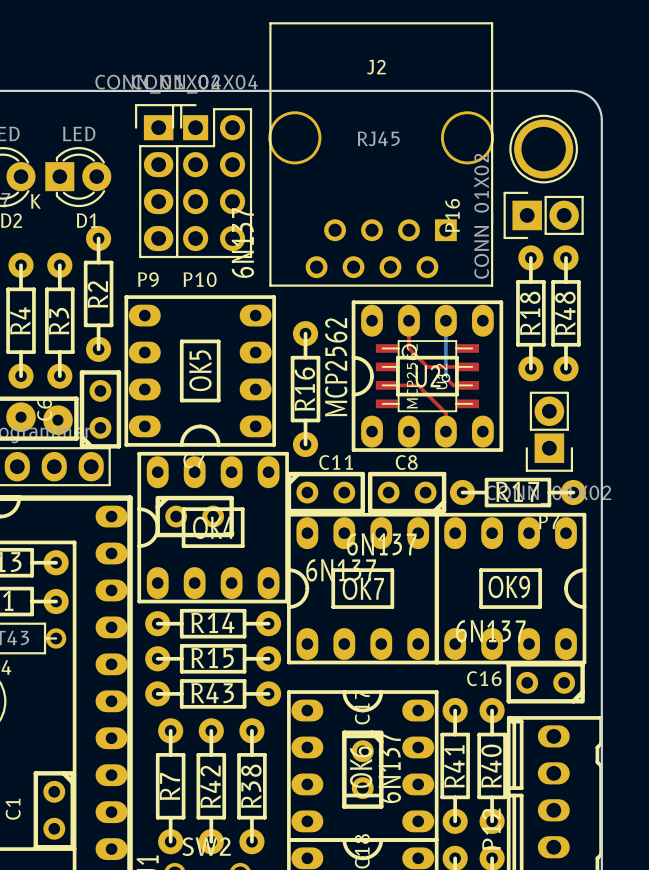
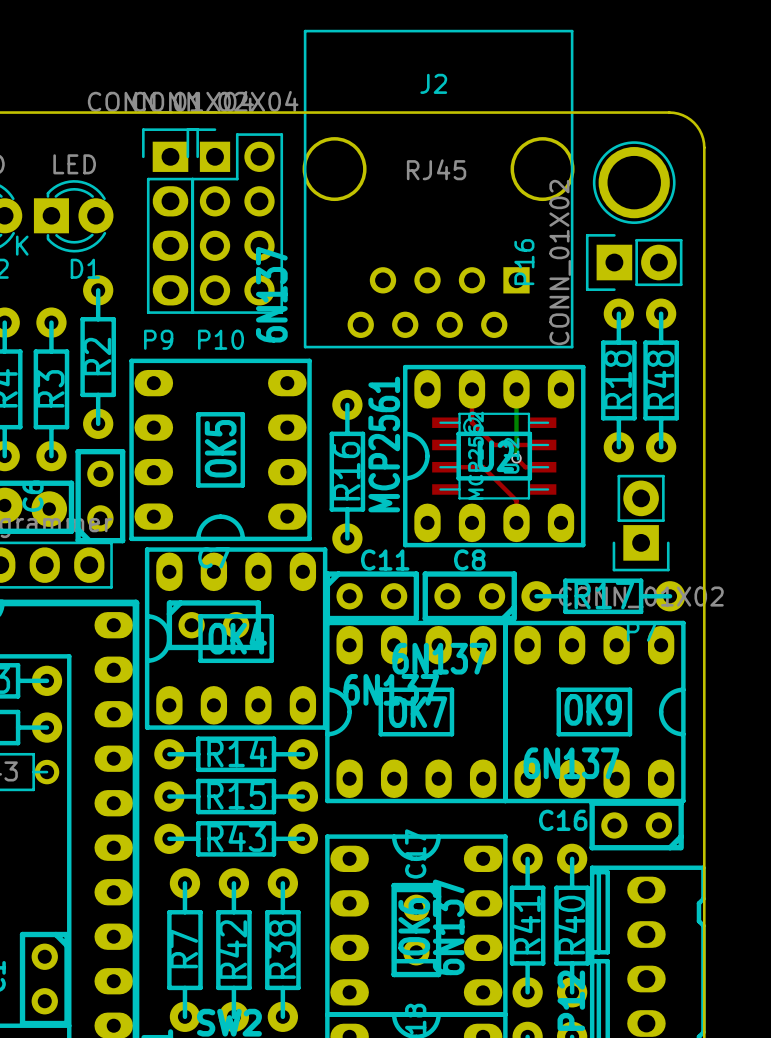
U2 value: MCP2562 (336, 367) -> MCP2561 (384, 444)

